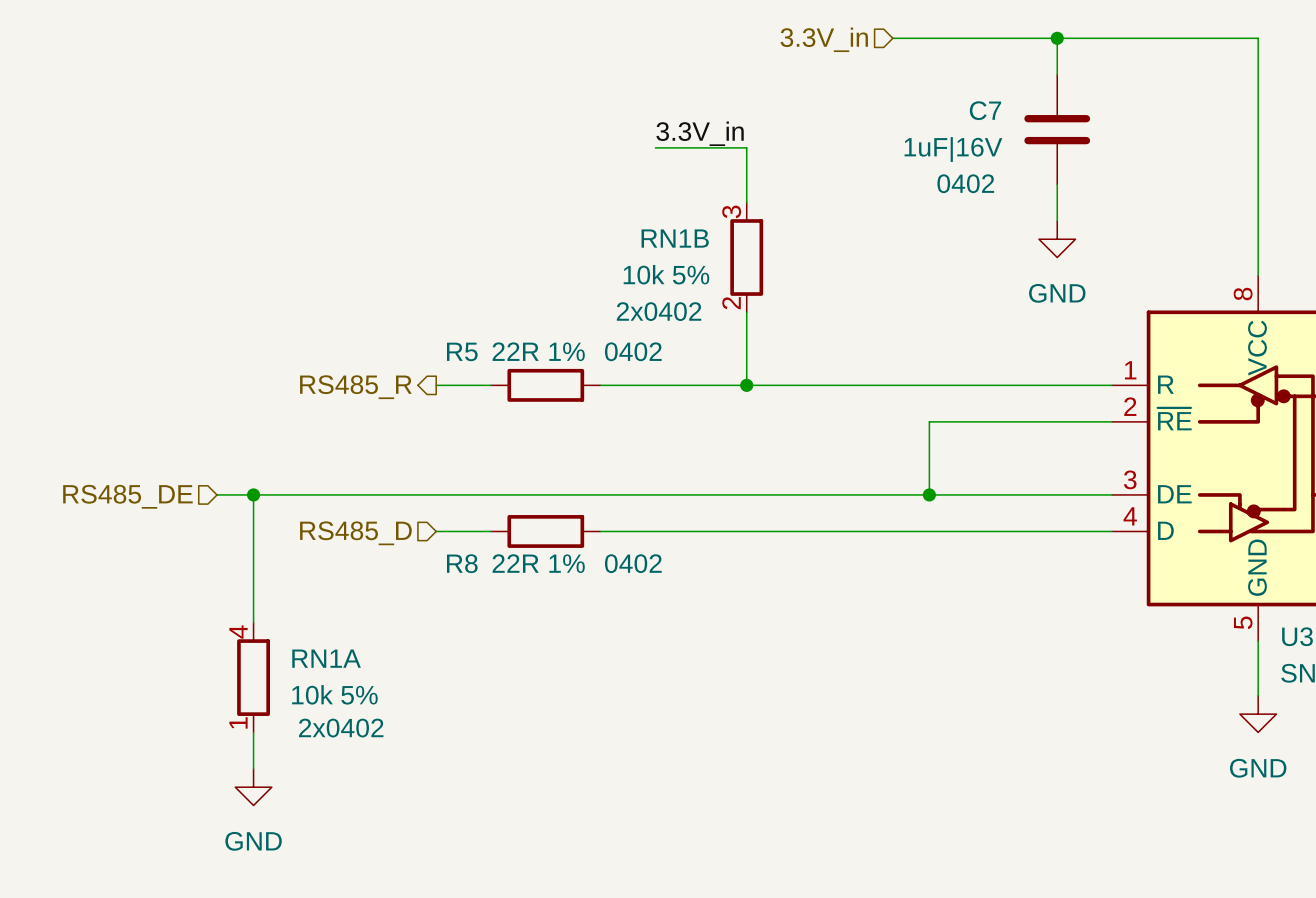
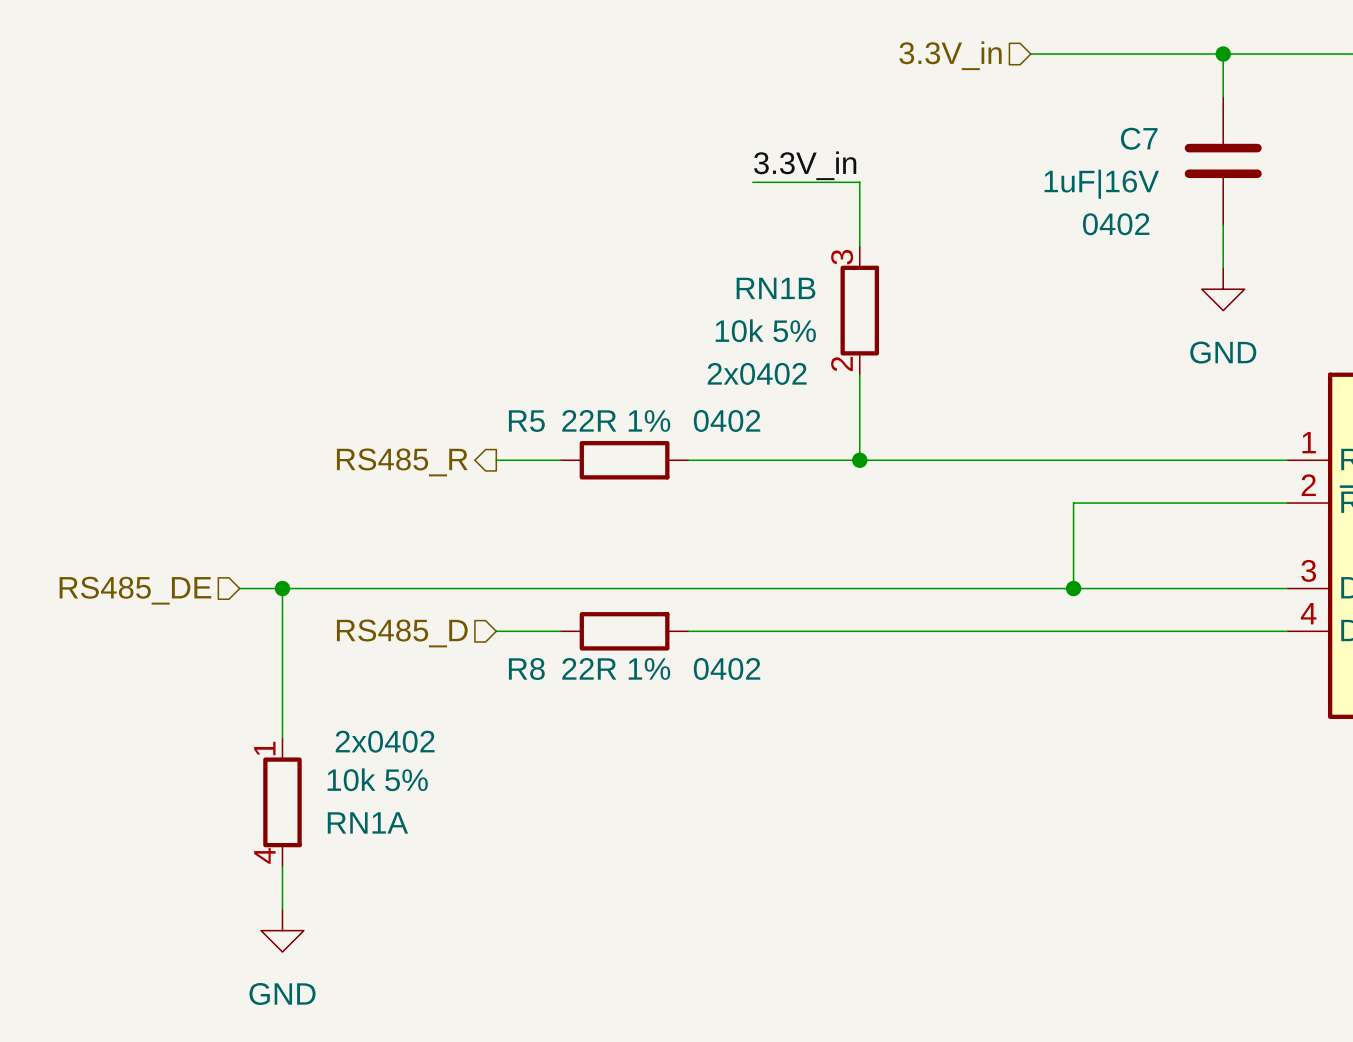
RN1A name position: RN1A (326, 658) -> RN1A (367, 822)
RN1A rotation: 0° (253, 677) -> 180° (282, 802)
RN1A value position: 10k 5% (334, 694) -> 10k 5% (377, 779)
RN1A text position: 2x0402 (341, 728) -> 2x0402 (385, 741)

